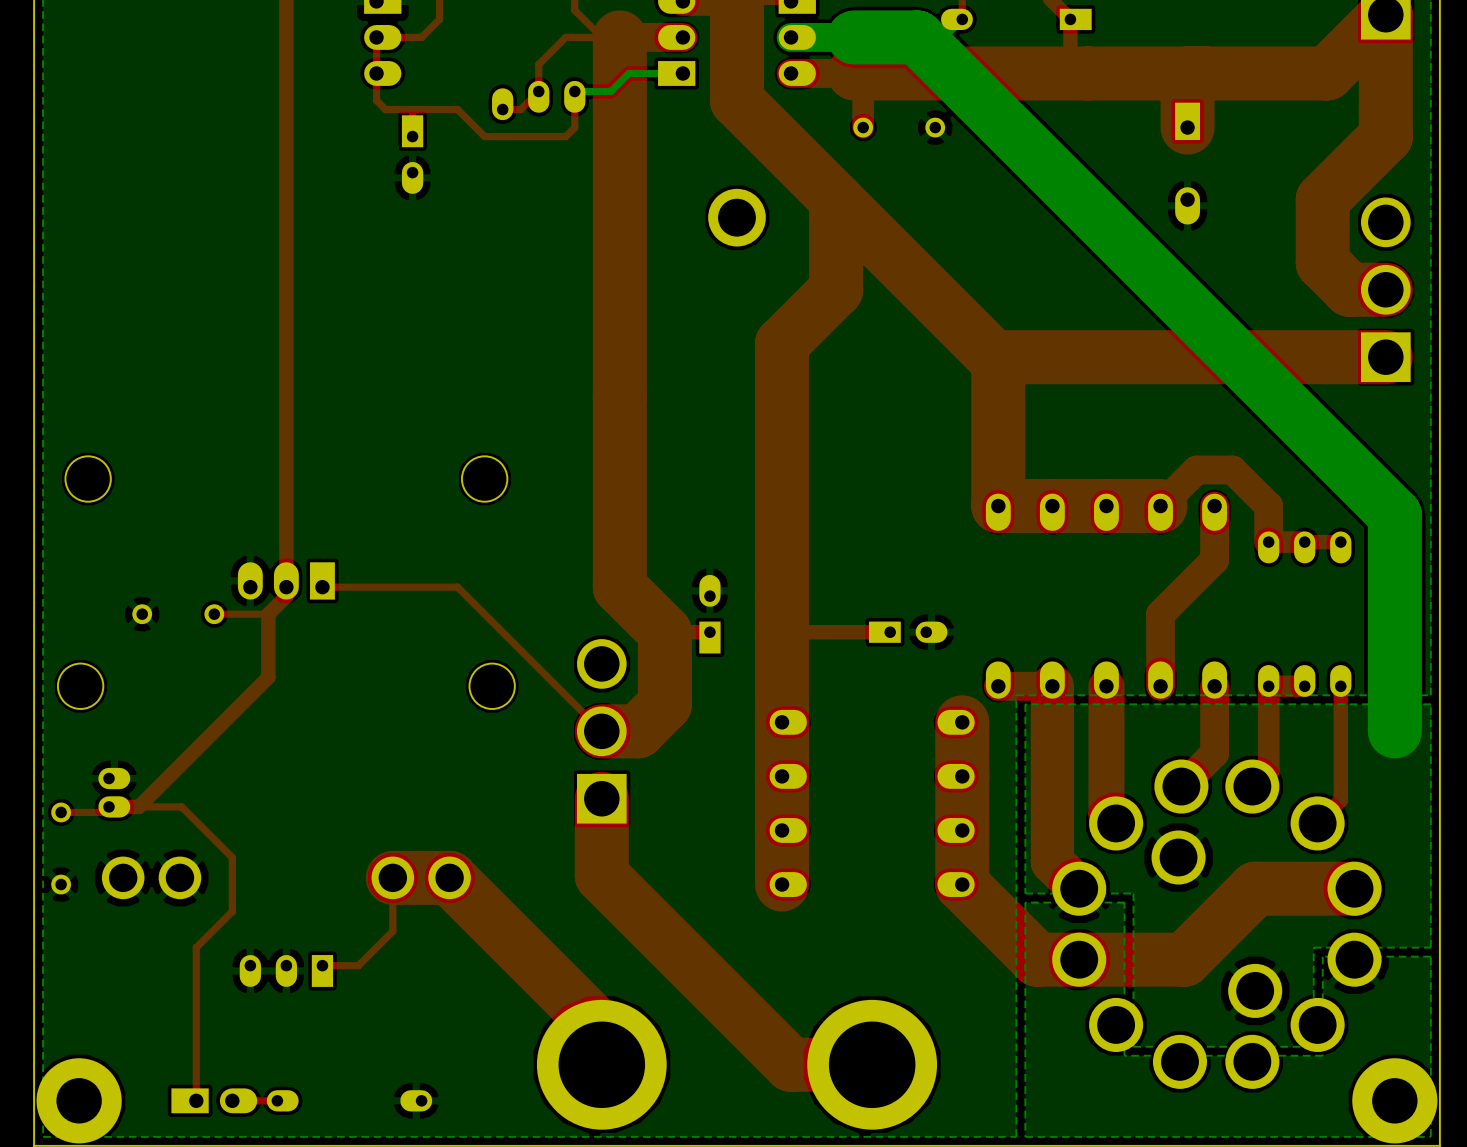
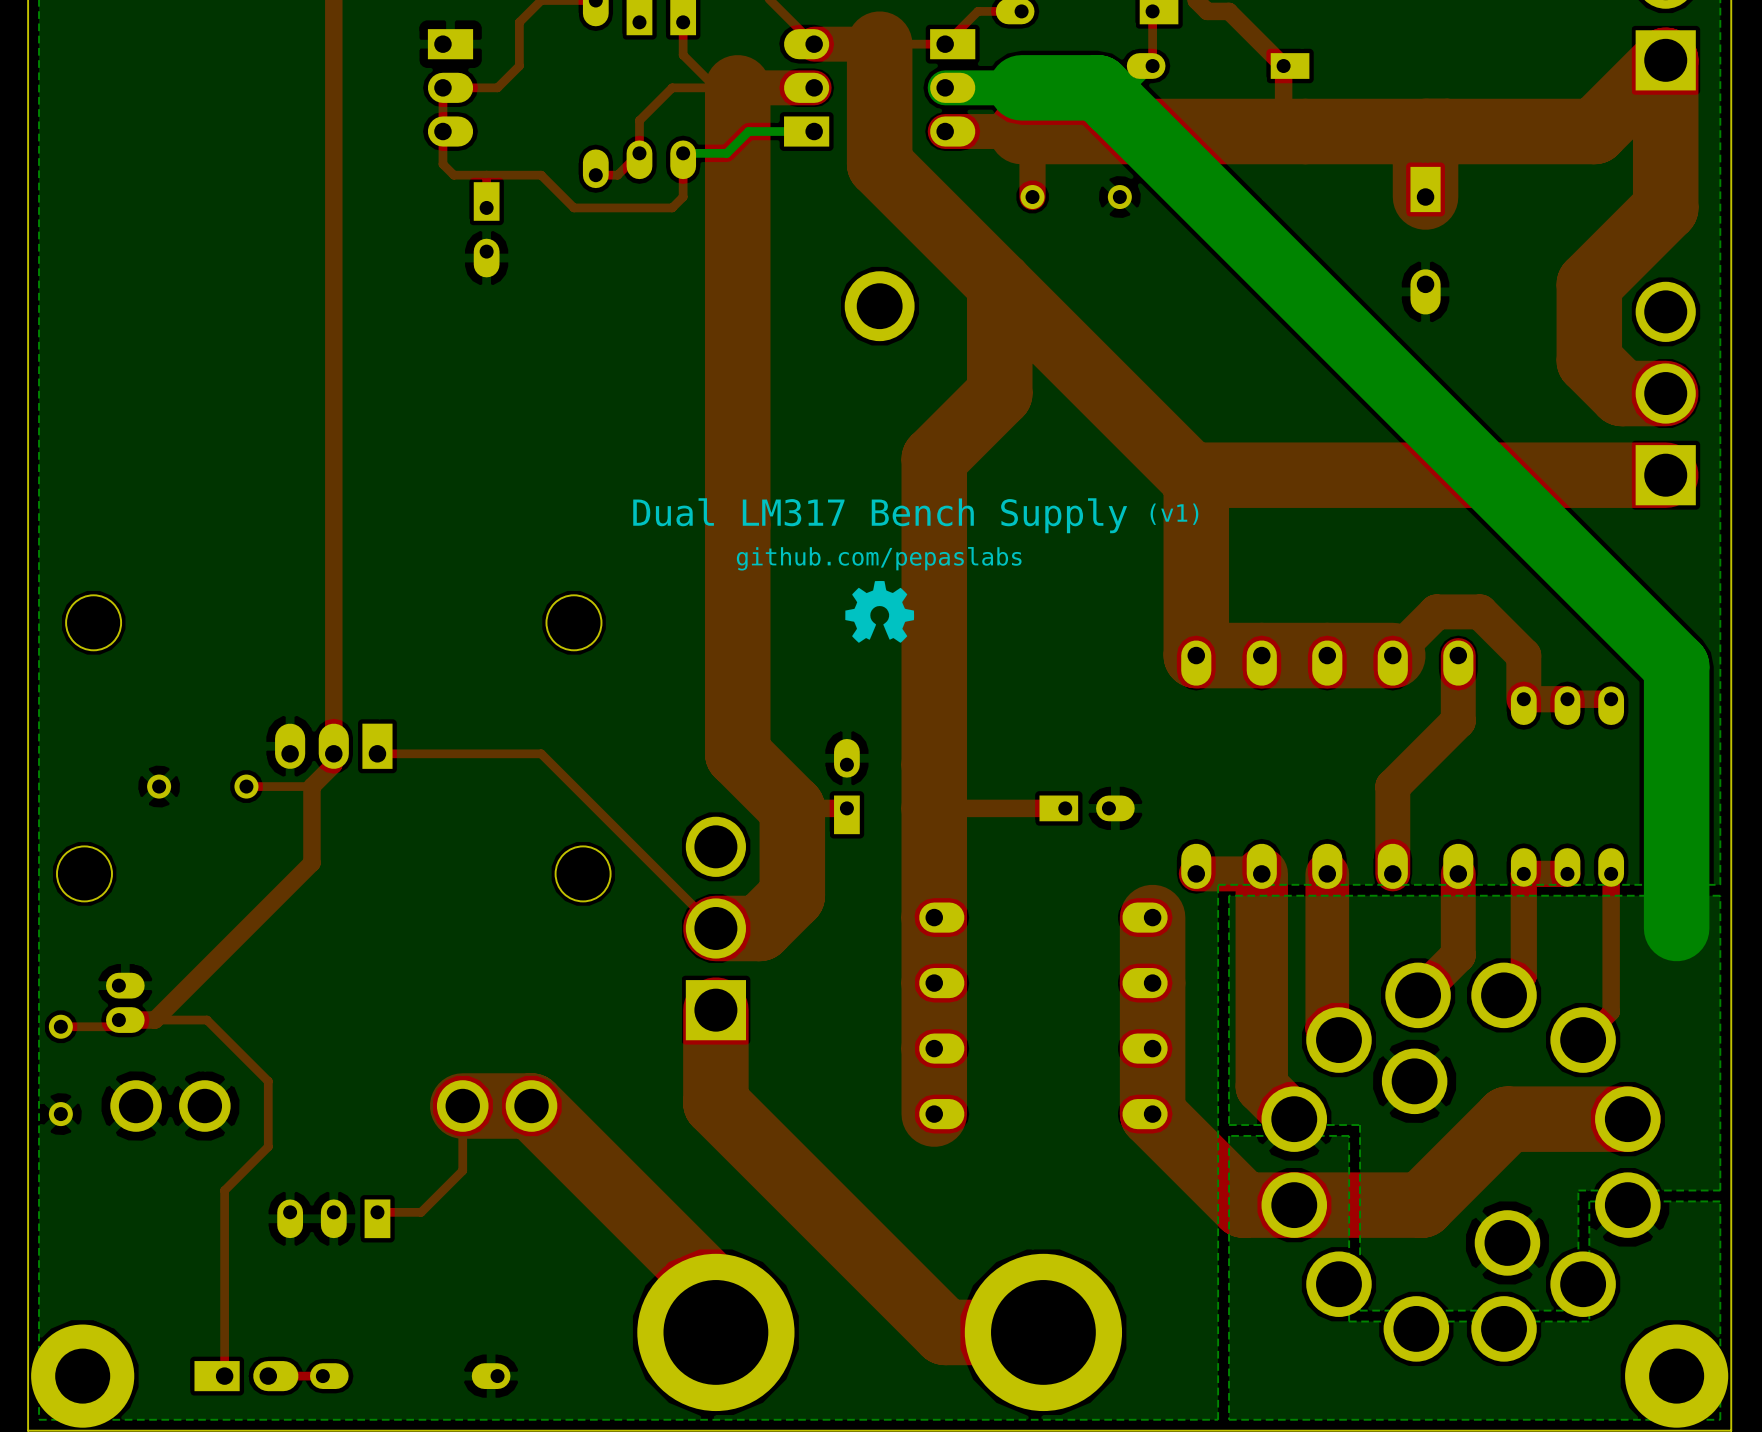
text: none -> (v1) (1174, 514)
text: none -> Dual LM317 Bench Supply (880, 515)
text: none -> github.com/pepaslabs (879, 558)
drawing: none -> [845, 580, 915, 643]

